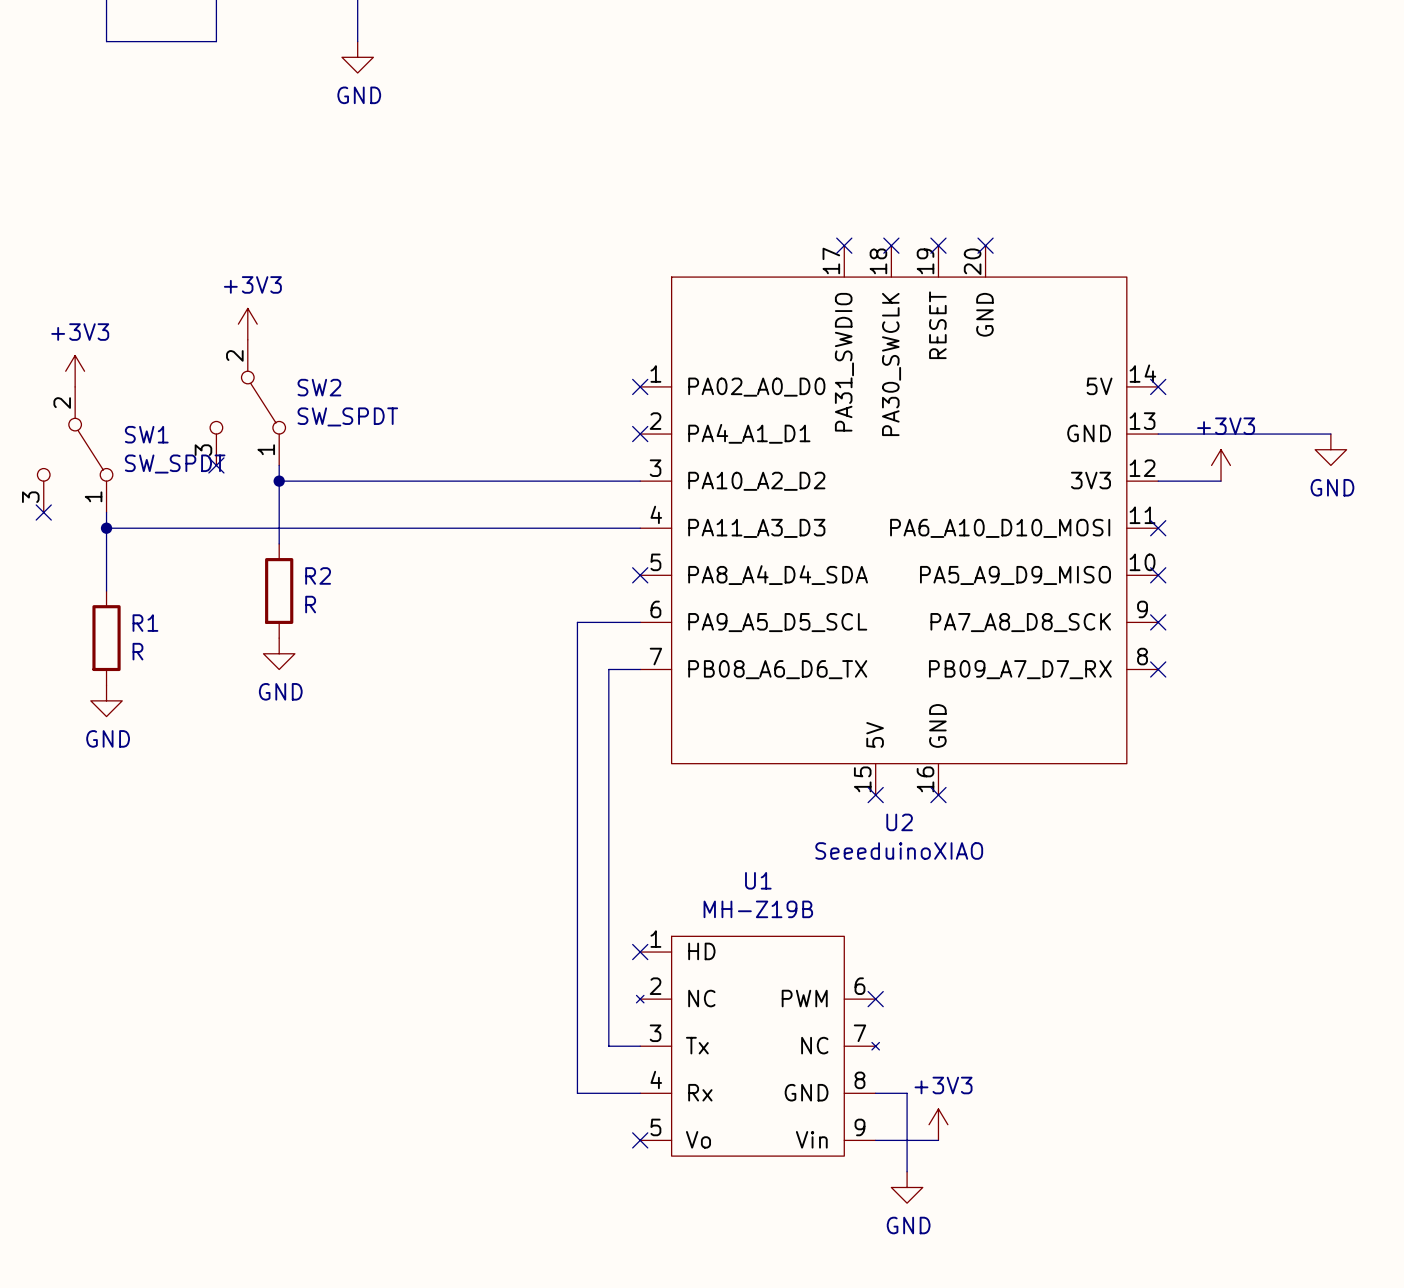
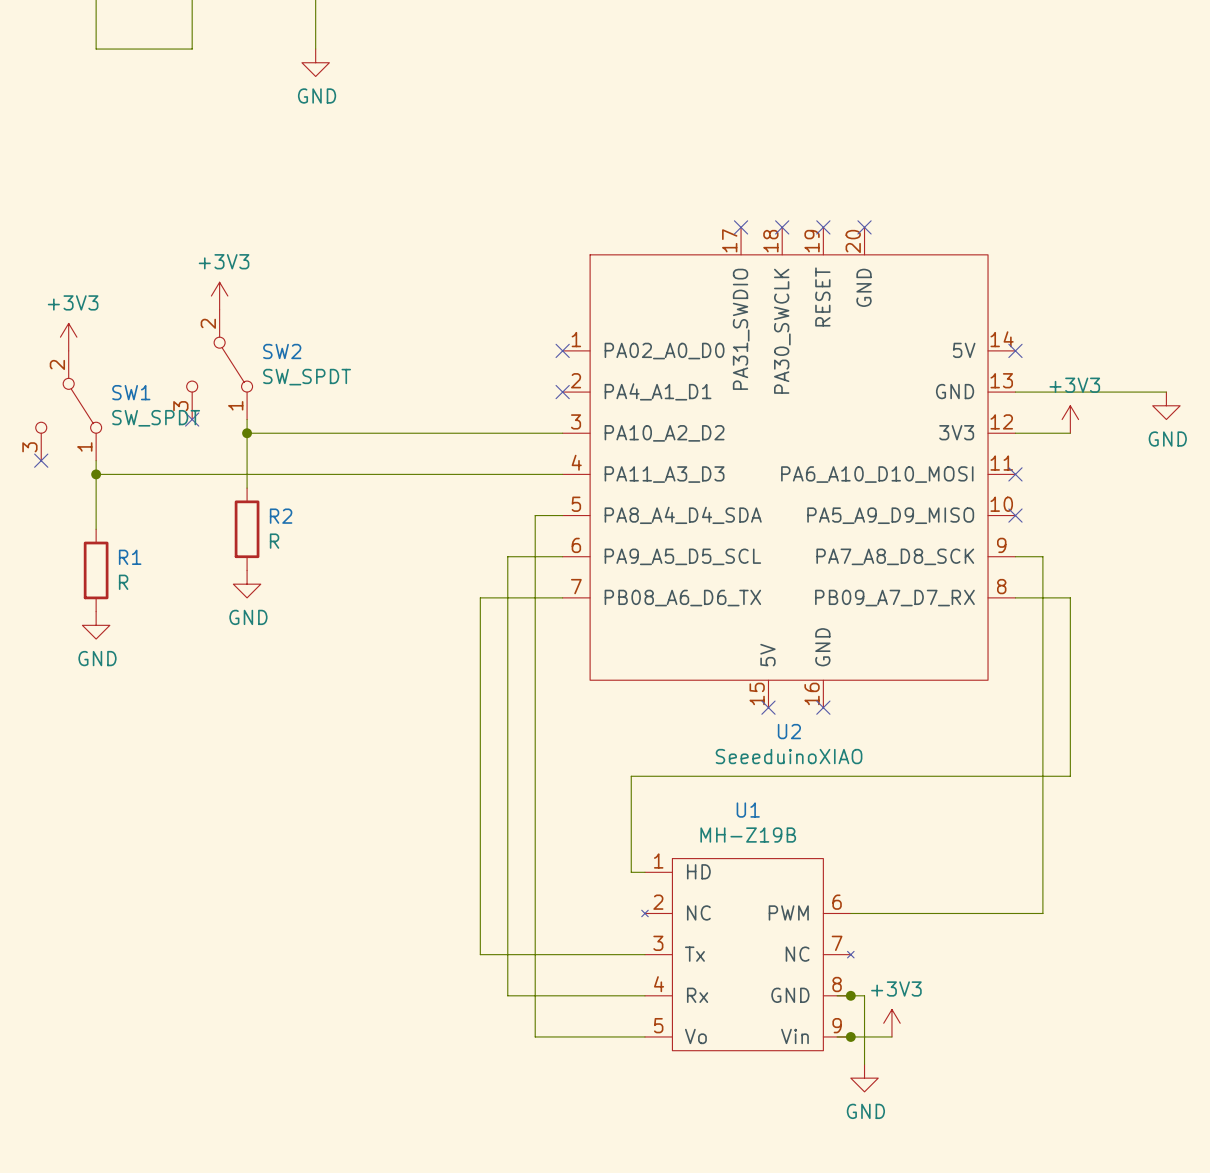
wire: none -> (562, 515) (535, 515) (535, 597) (480, 597) (480, 954) (644, 954)
no-connect mark: (640, 575) -> none
wire: none -> (1015, 556) (1042, 556) (1042, 913) (850, 913)
no-connect mark: (1158, 622) -> none
wire: none -> (1015, 597) (1070, 597) (1070, 776) (631, 776) (631, 872) (644, 872)
no-connect mark: (1158, 669) -> none
no-connect mark: (640, 952) -> none
no-connect mark: (875, 999) -> none
wire: (608, 1046) (640, 1046) -> (535, 927) (535, 1036) (644, 1036)
U1 position: (757, 1046) -> (747, 954)
wire: (577, 1093) (640, 1093) -> (507, 968) (507, 995) (644, 995)
wire: (875, 1093) (907, 1093) (907, 1171) -> (837, 995) (864, 995) (864, 1064)
power symbol position: +3V3 (938, 1124) -> +3V3 (891, 1023)
junction: none -> (850, 995)
no-connect mark: (640, 1140) -> none
wire: (875, 1140) (938, 1140) -> (837, 1036) (891, 1036)
junction: none -> (850, 1036)
power symbol position: GND (907, 1187) -> GND (864, 1078)

